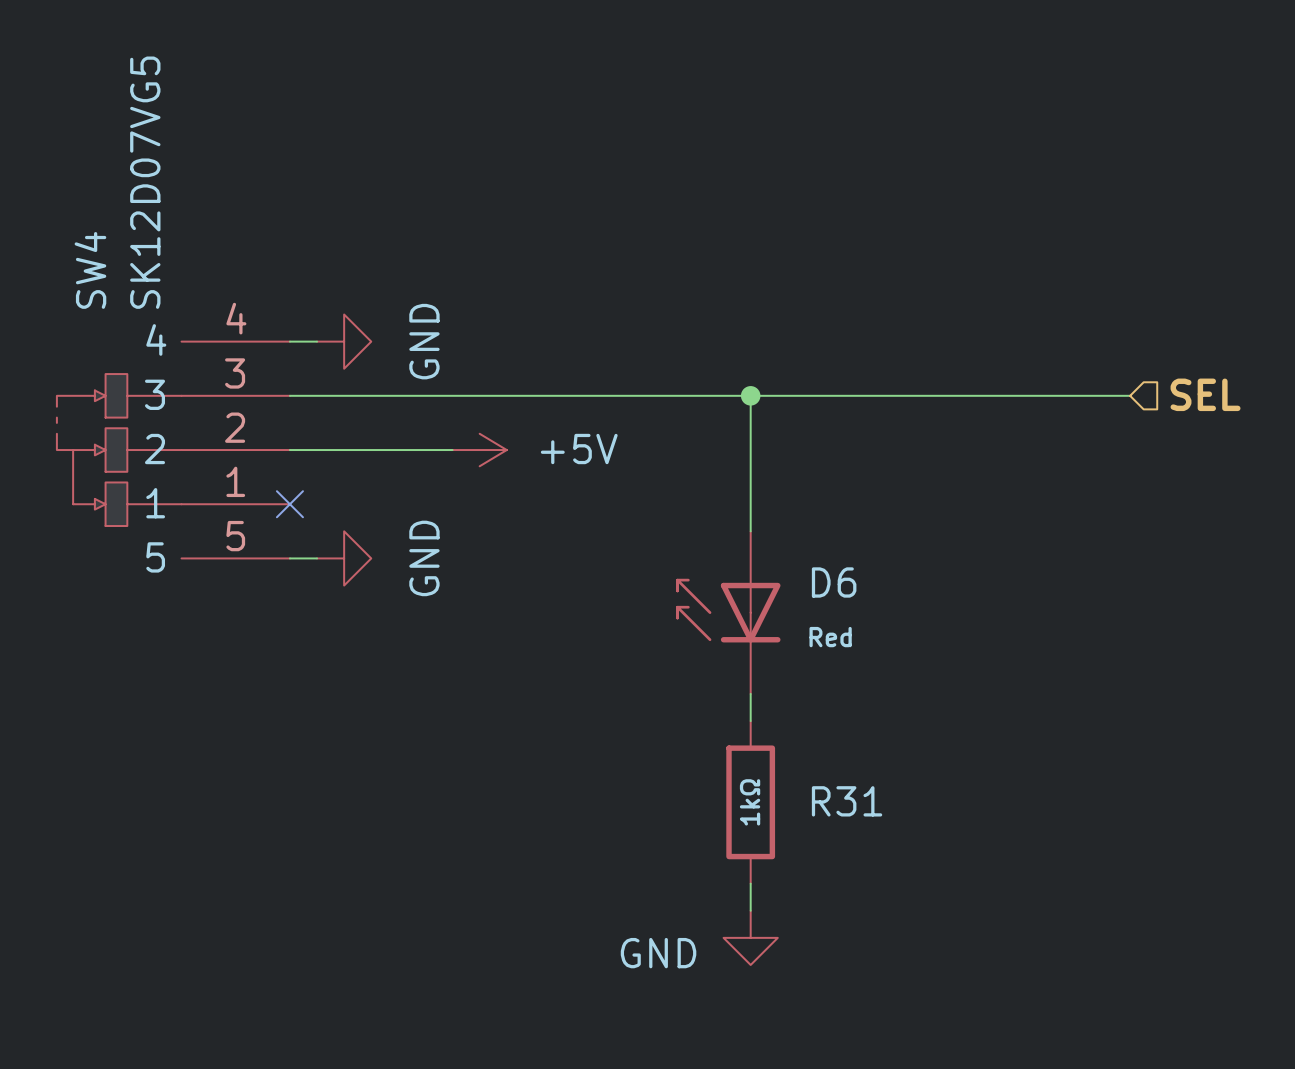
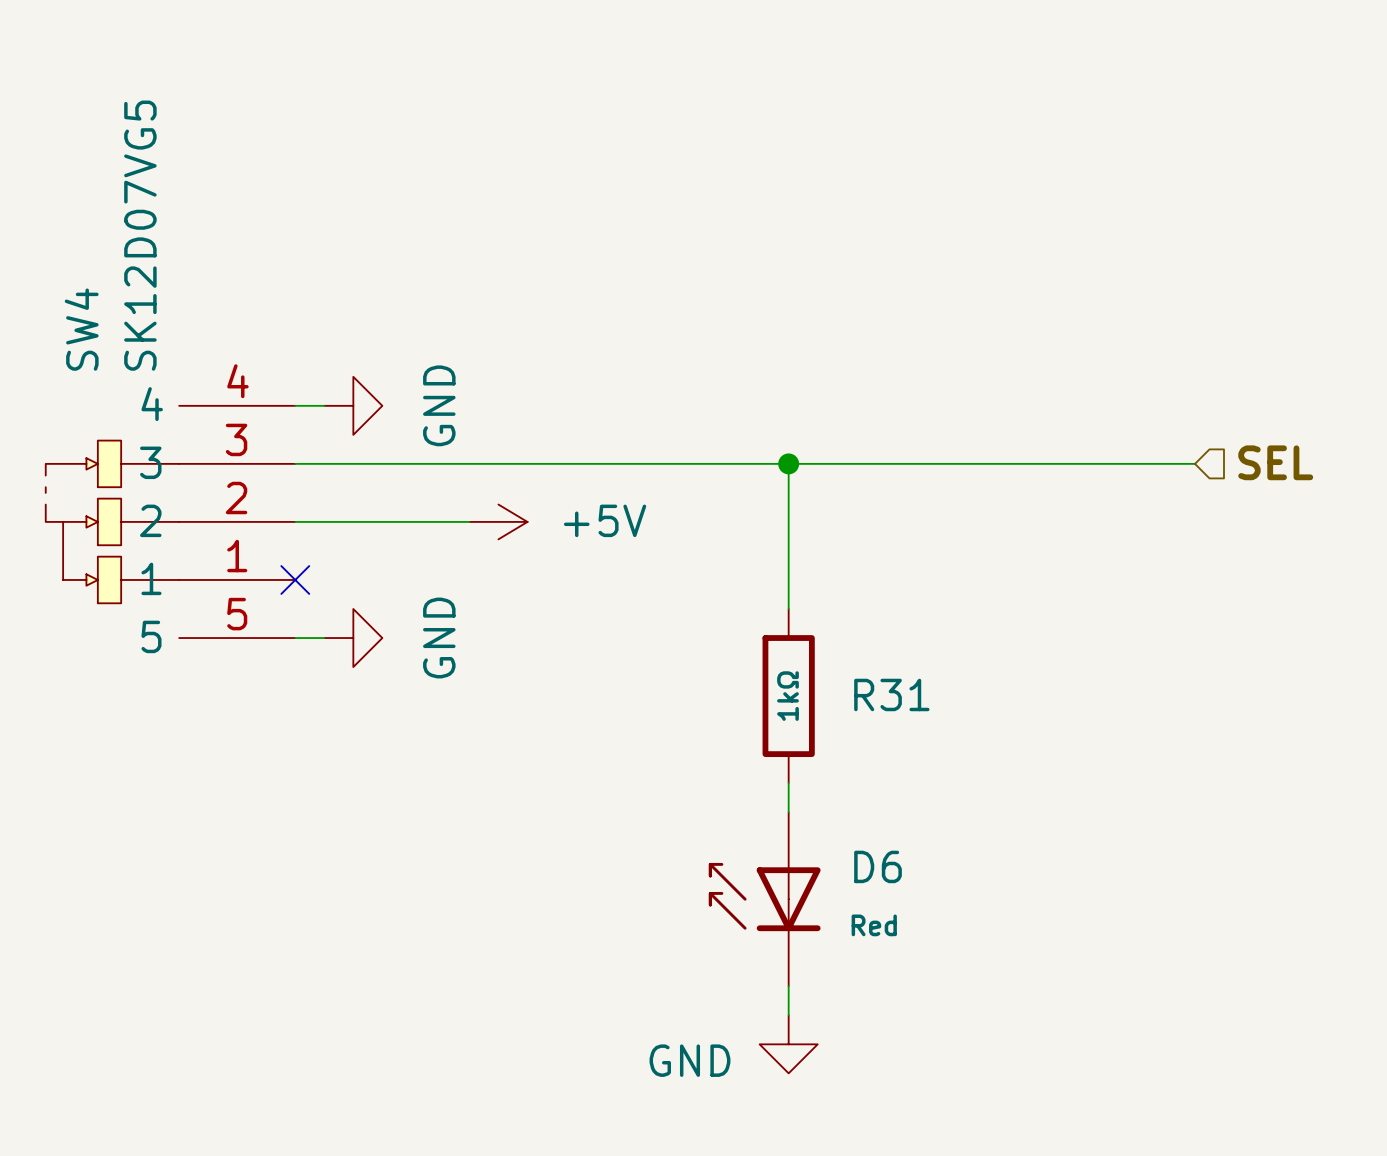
D6 position: (728, 612) -> (764, 899)
R31 position: (750, 802) -> (788, 696)

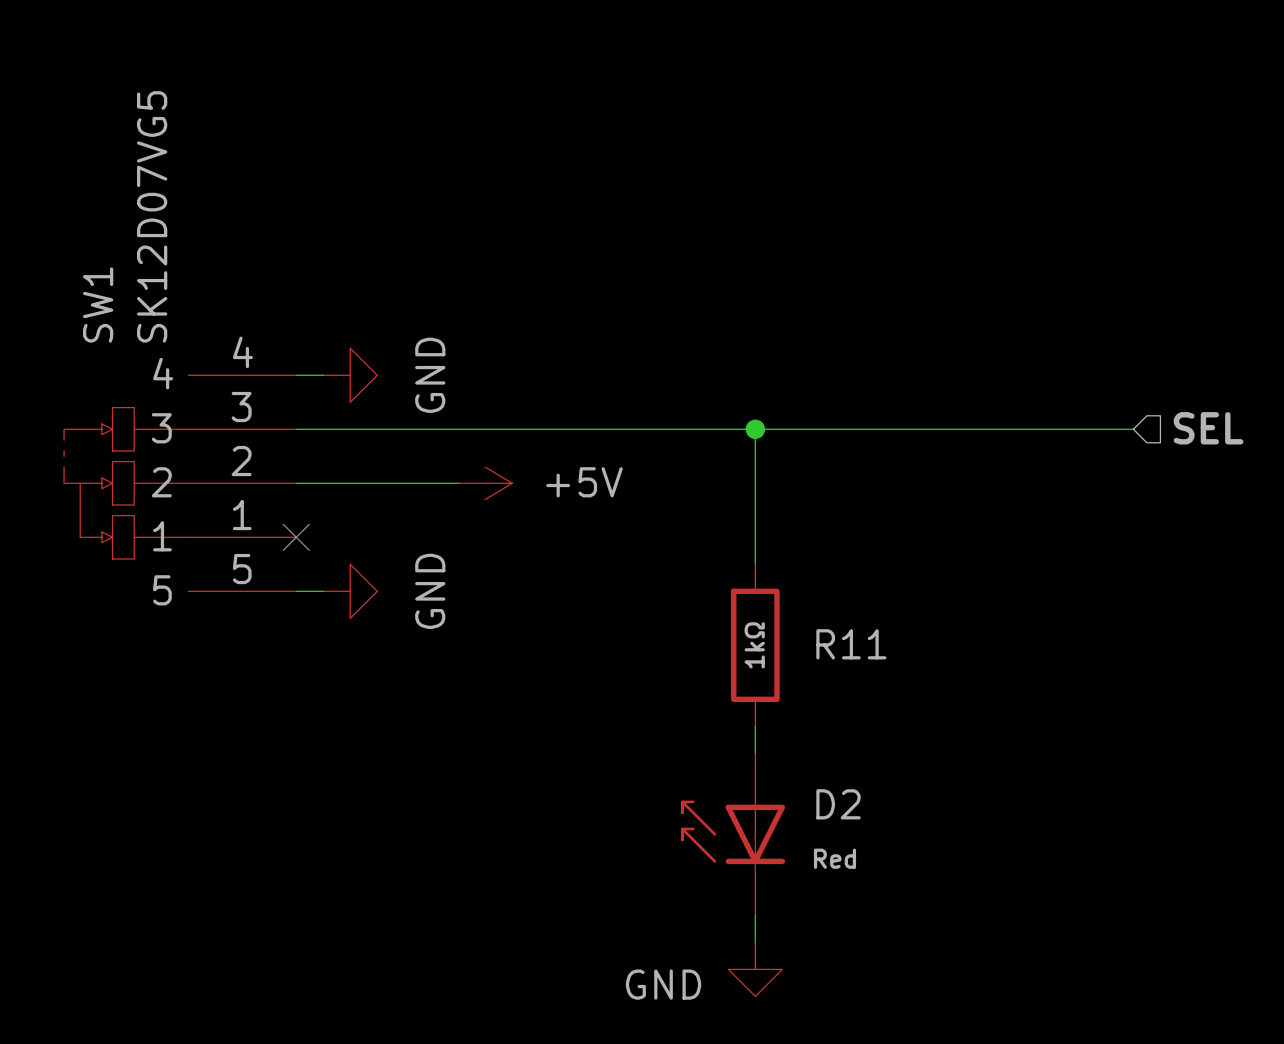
SW4 name: SW4 (81, 329) -> SW1 (98, 304)
R31 name: R31 (891, 694) -> R11 (851, 644)
D6 name: D6 (878, 866) -> D2 (838, 804)

